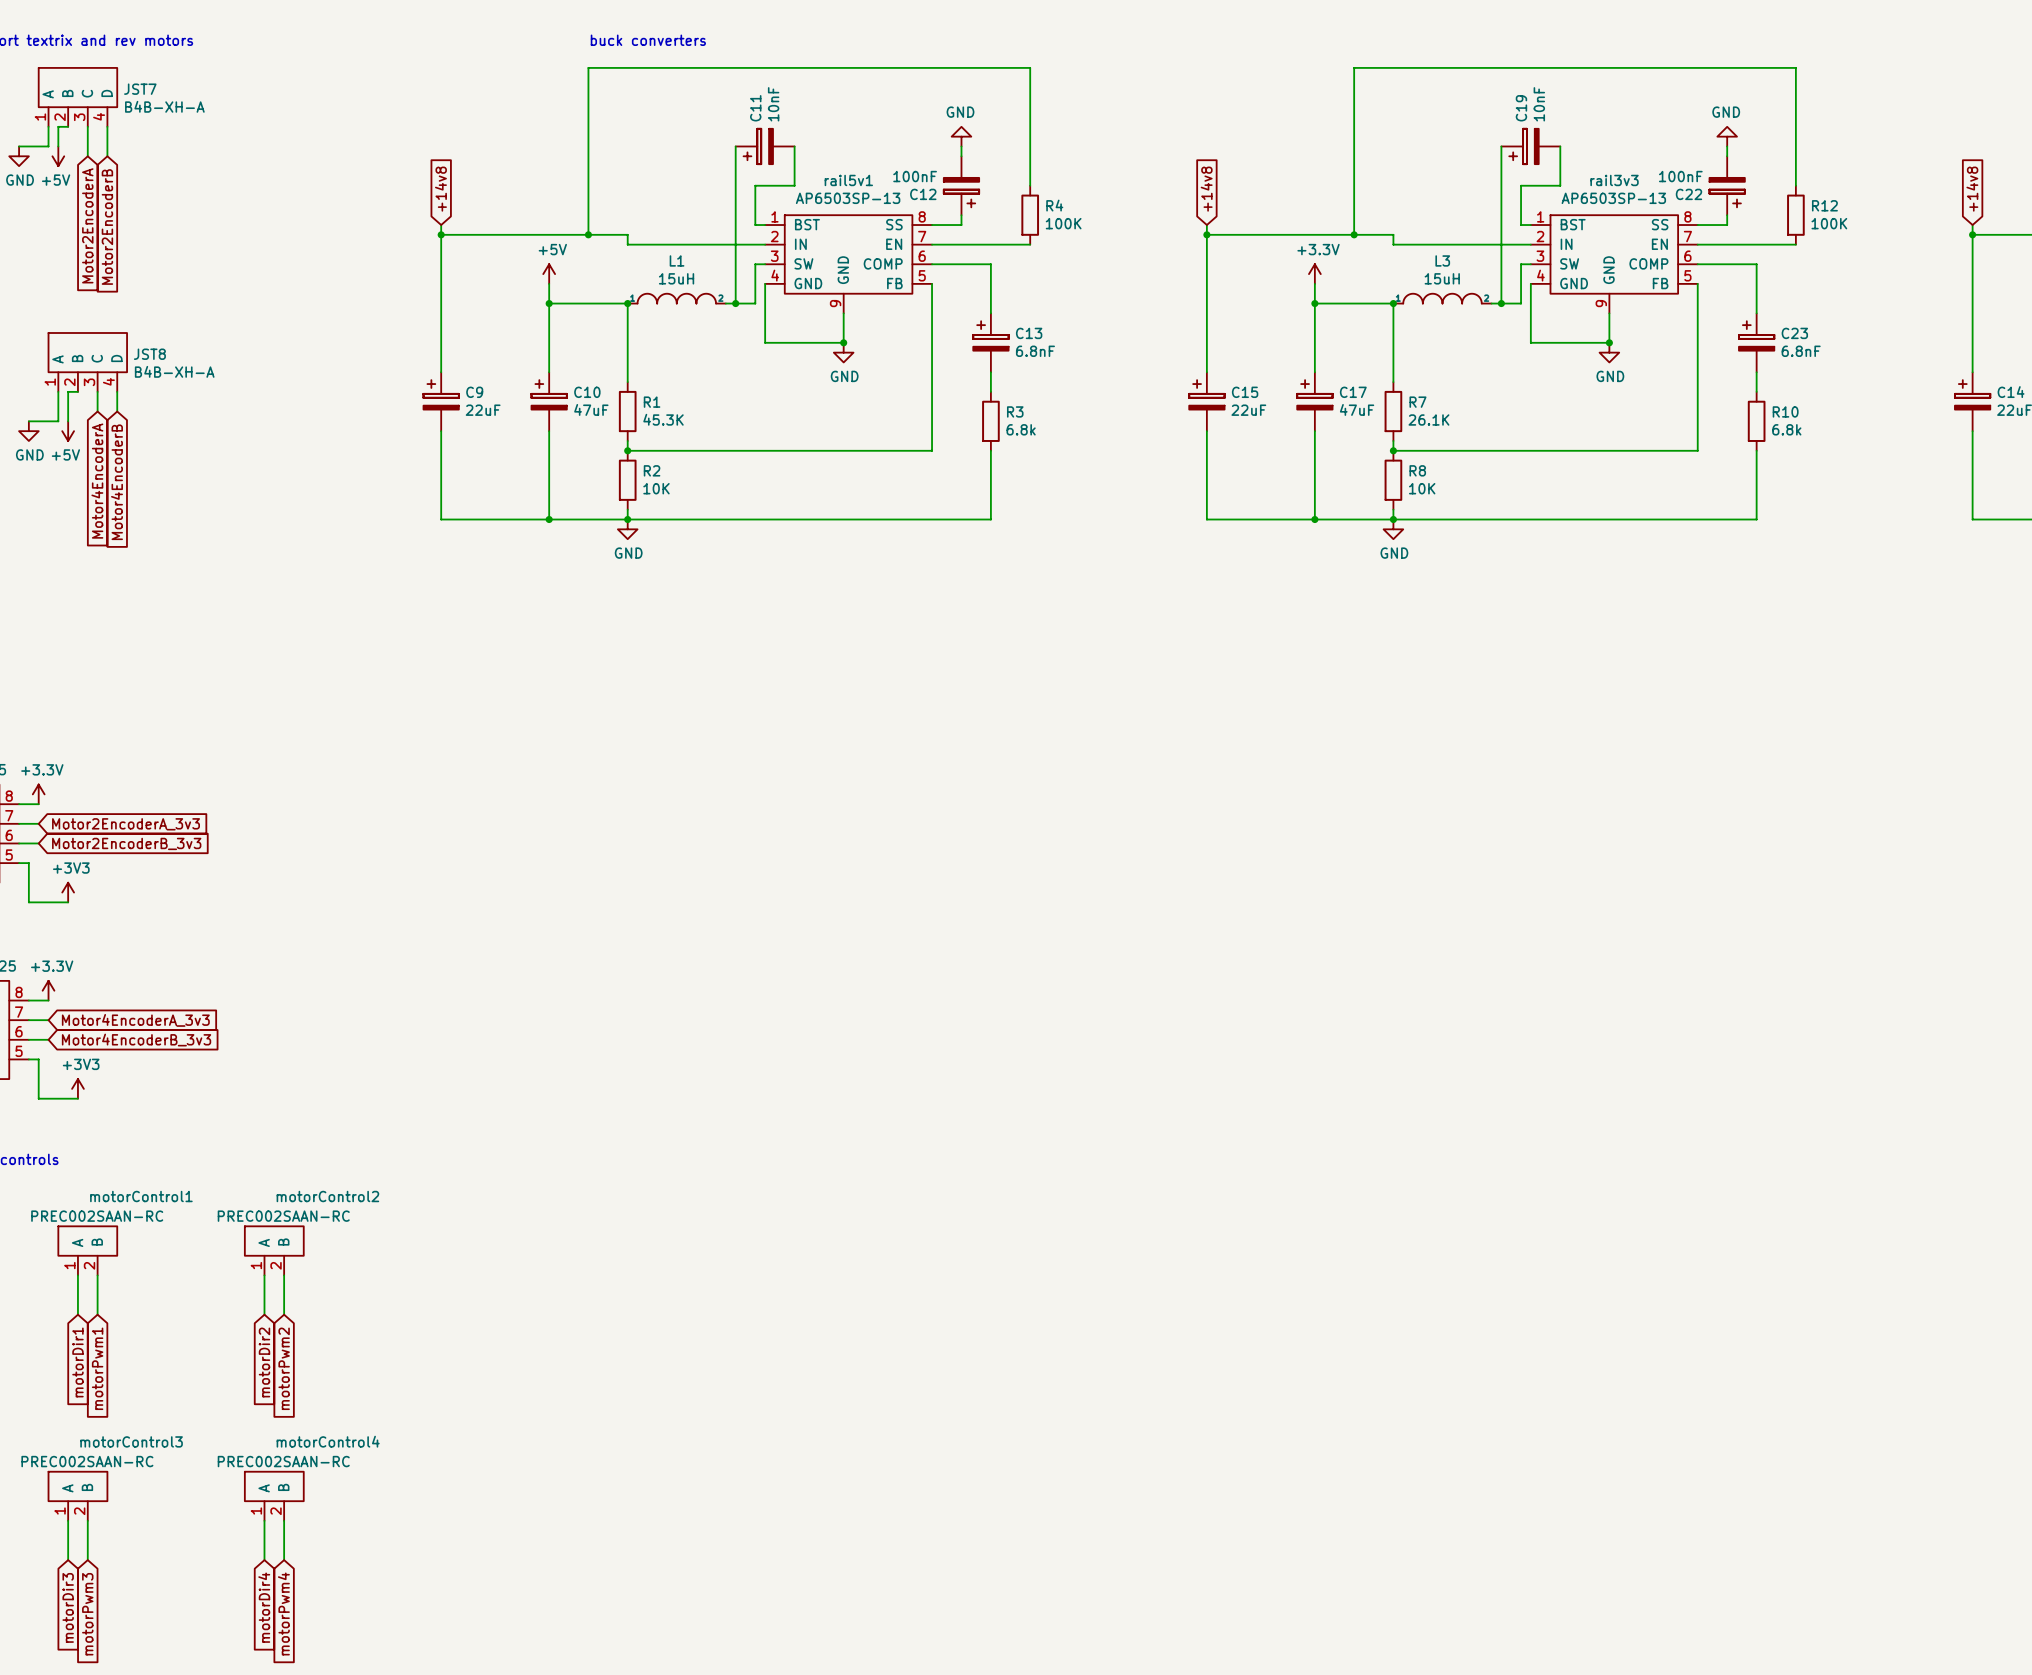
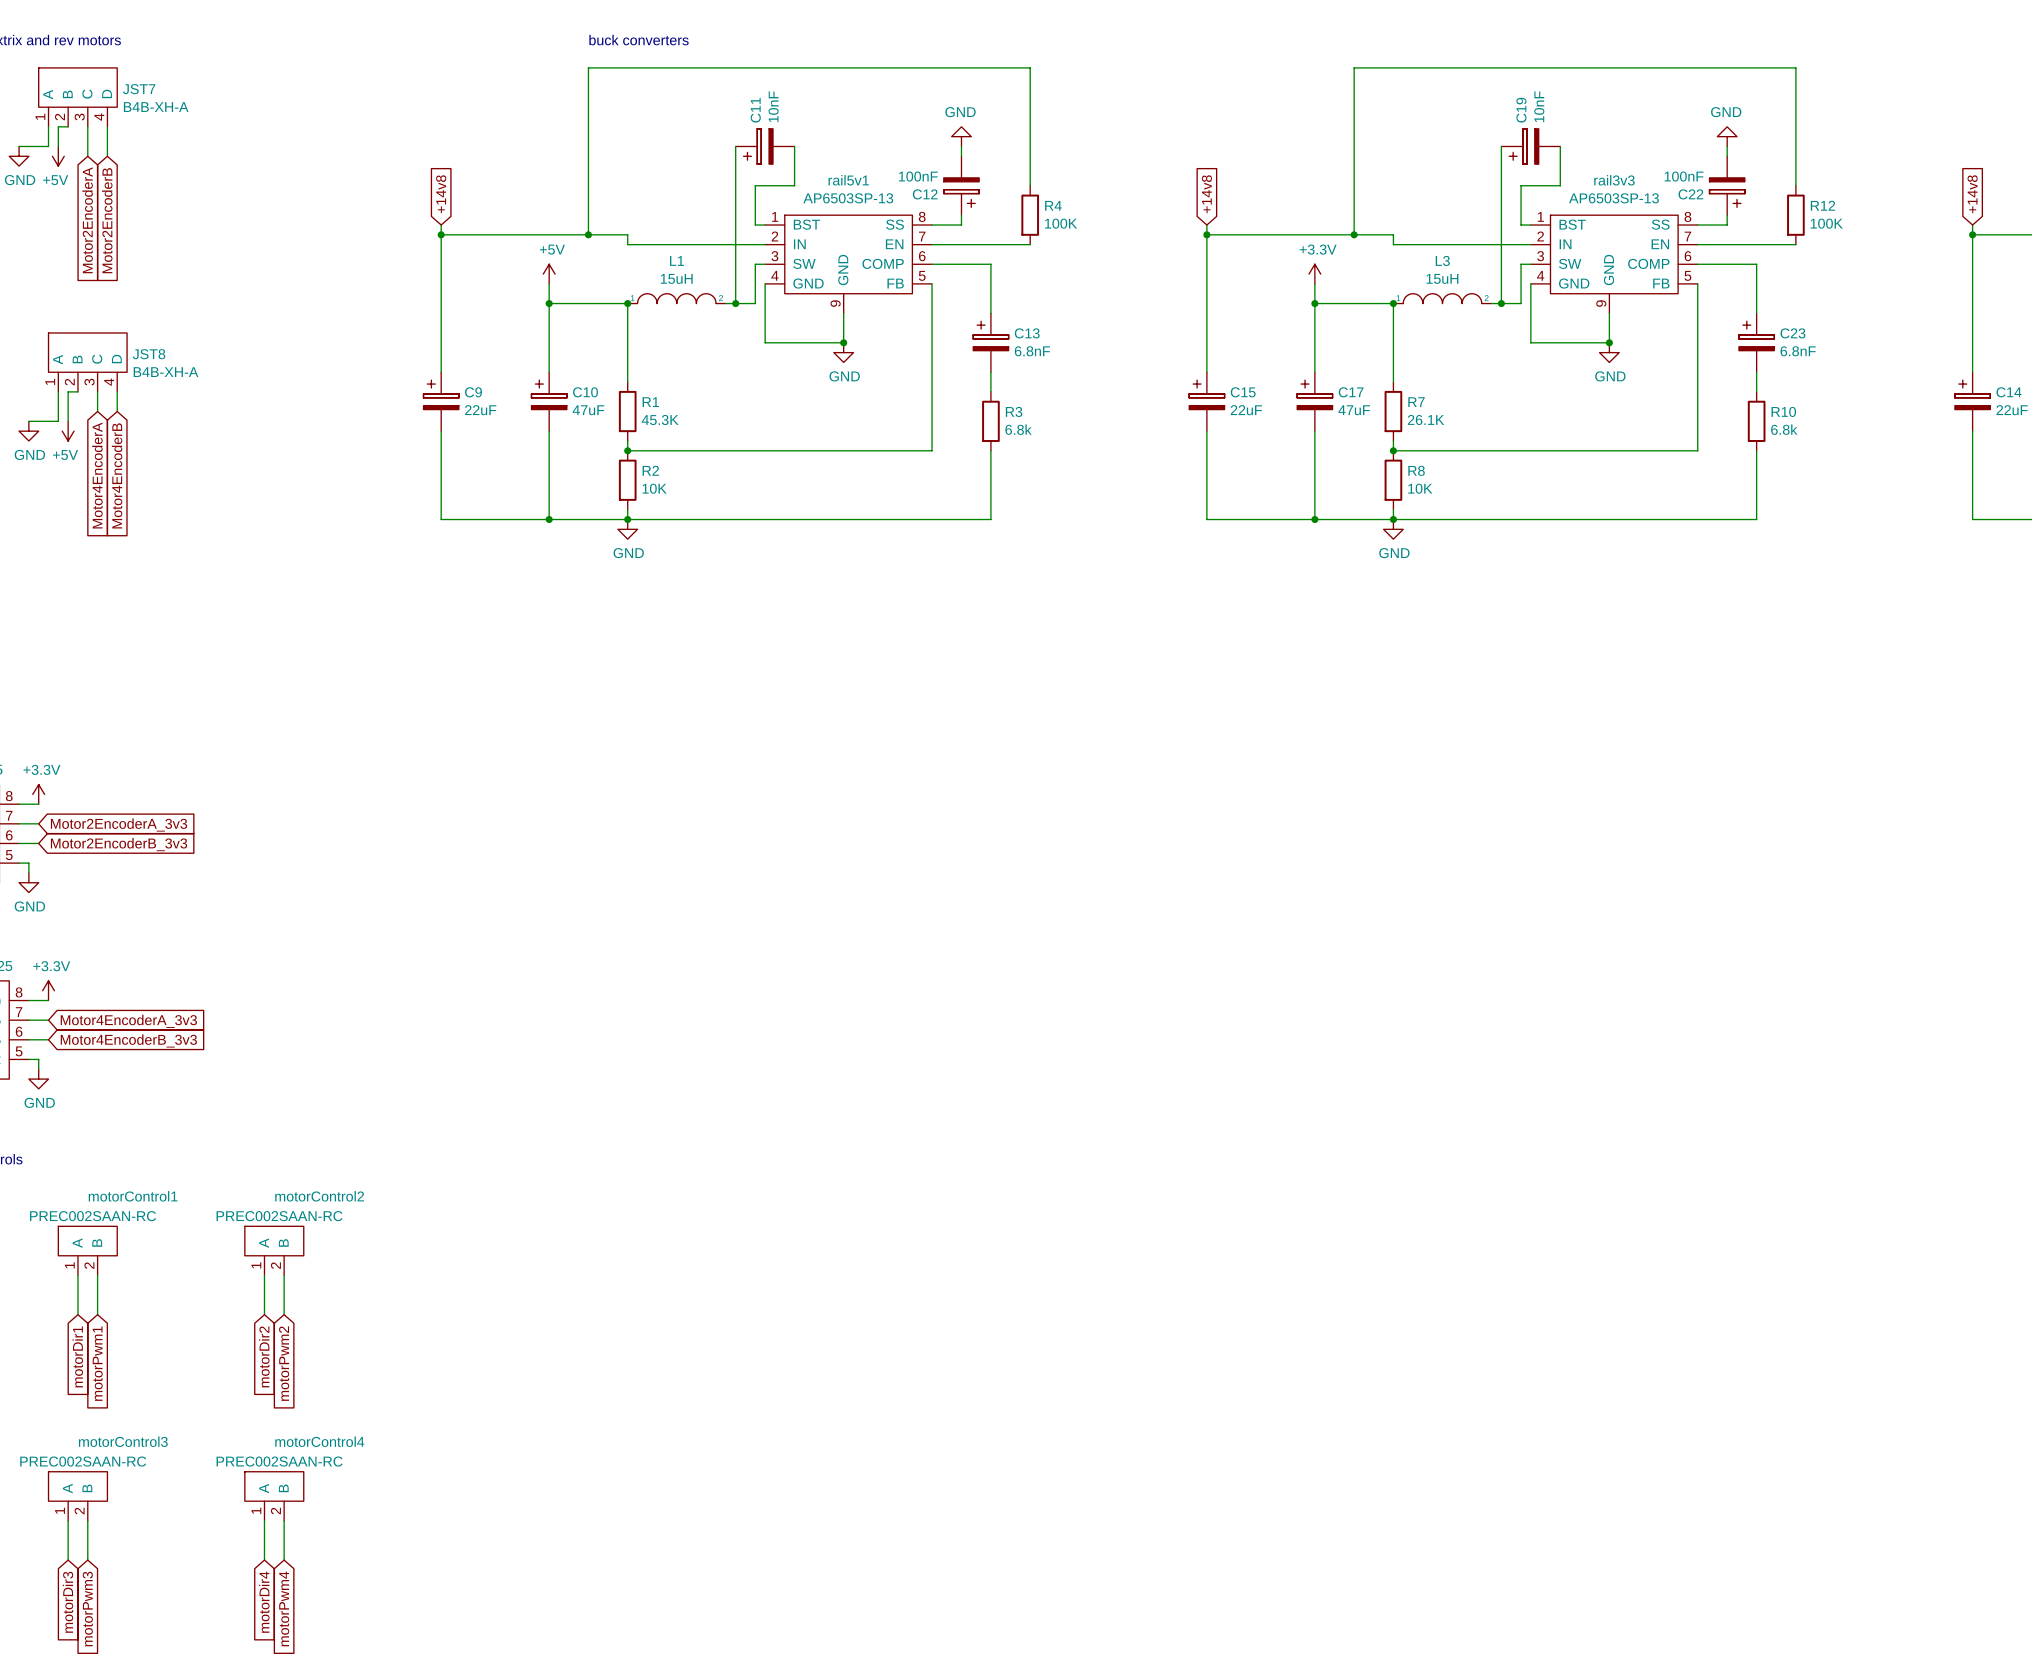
wire: (28, 872) (28, 902) (68, 902) -> none
power symbol: none -> GND (28, 882)
power symbol: +3V3 (68, 892) -> none
wire: (38, 1069) (38, 1098) (77, 1098) -> none
power symbol: none -> GND (38, 1079)
power symbol: +3V3 (77, 1088) -> none

